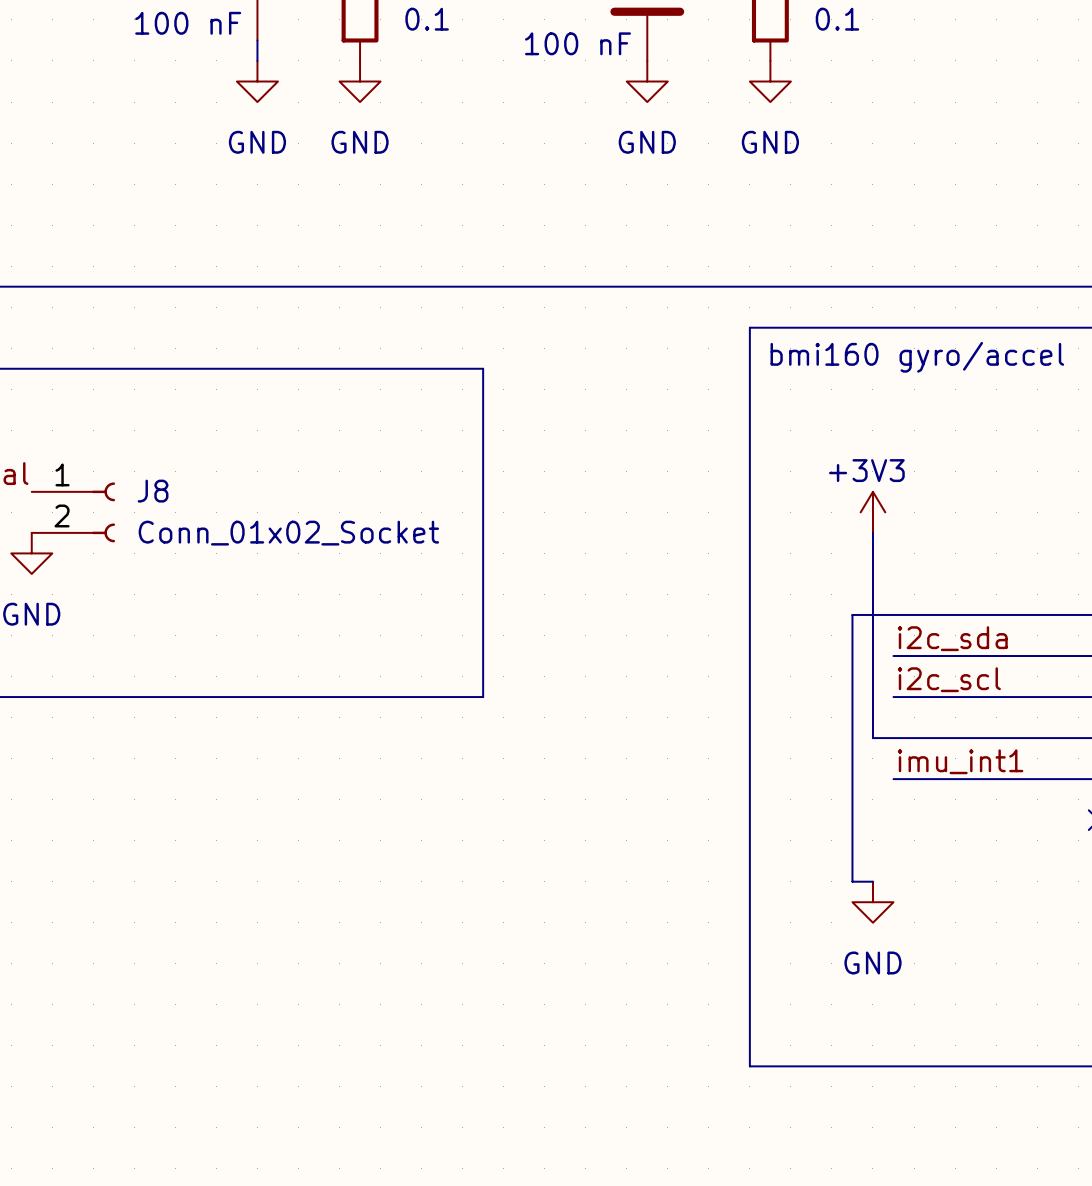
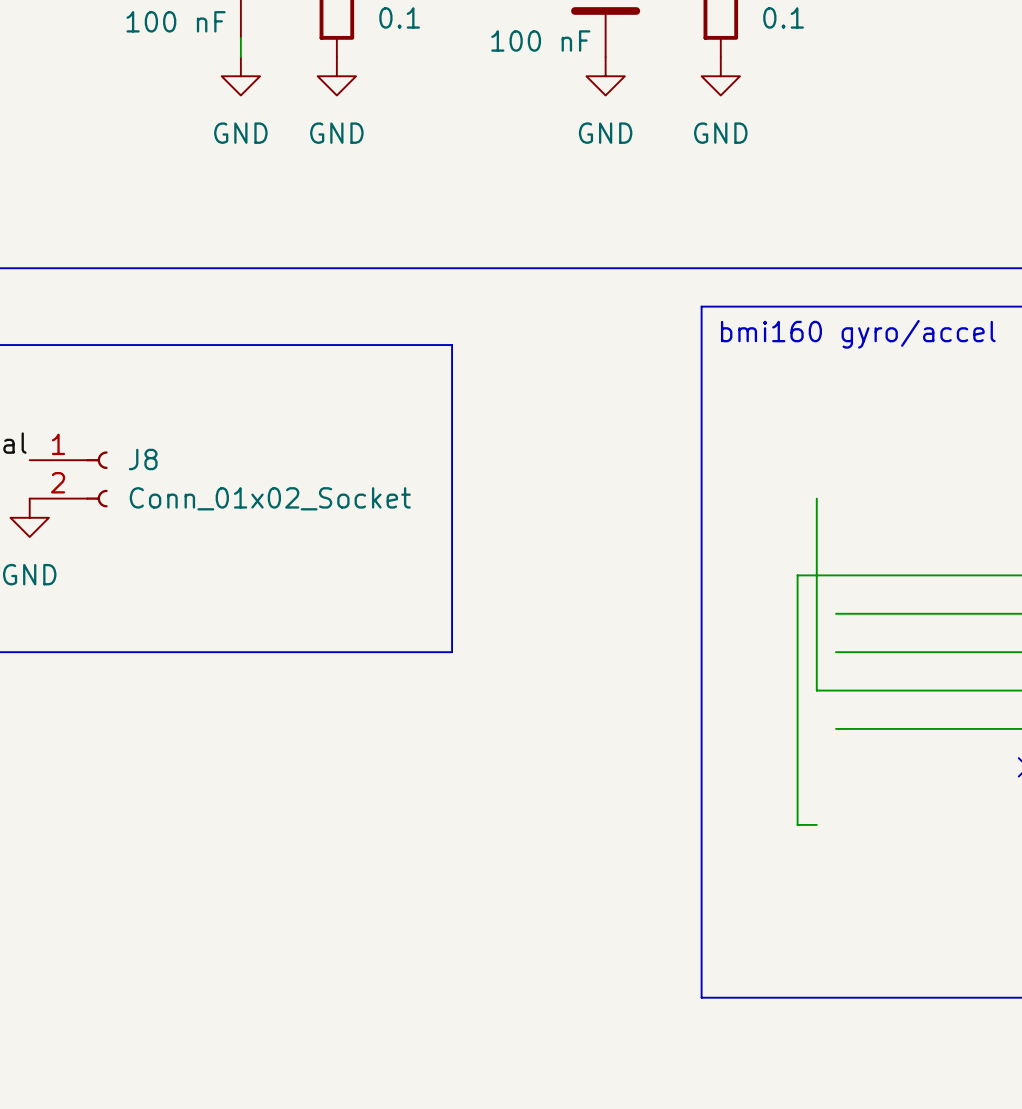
power symbol: +3V3 (872, 512) -> none
label: i2c_sda (952, 638) -> none
label: i2c_scl (949, 679) -> none
label: imu_int1 (960, 761) -> none
power symbol: GND (872, 902) -> none

